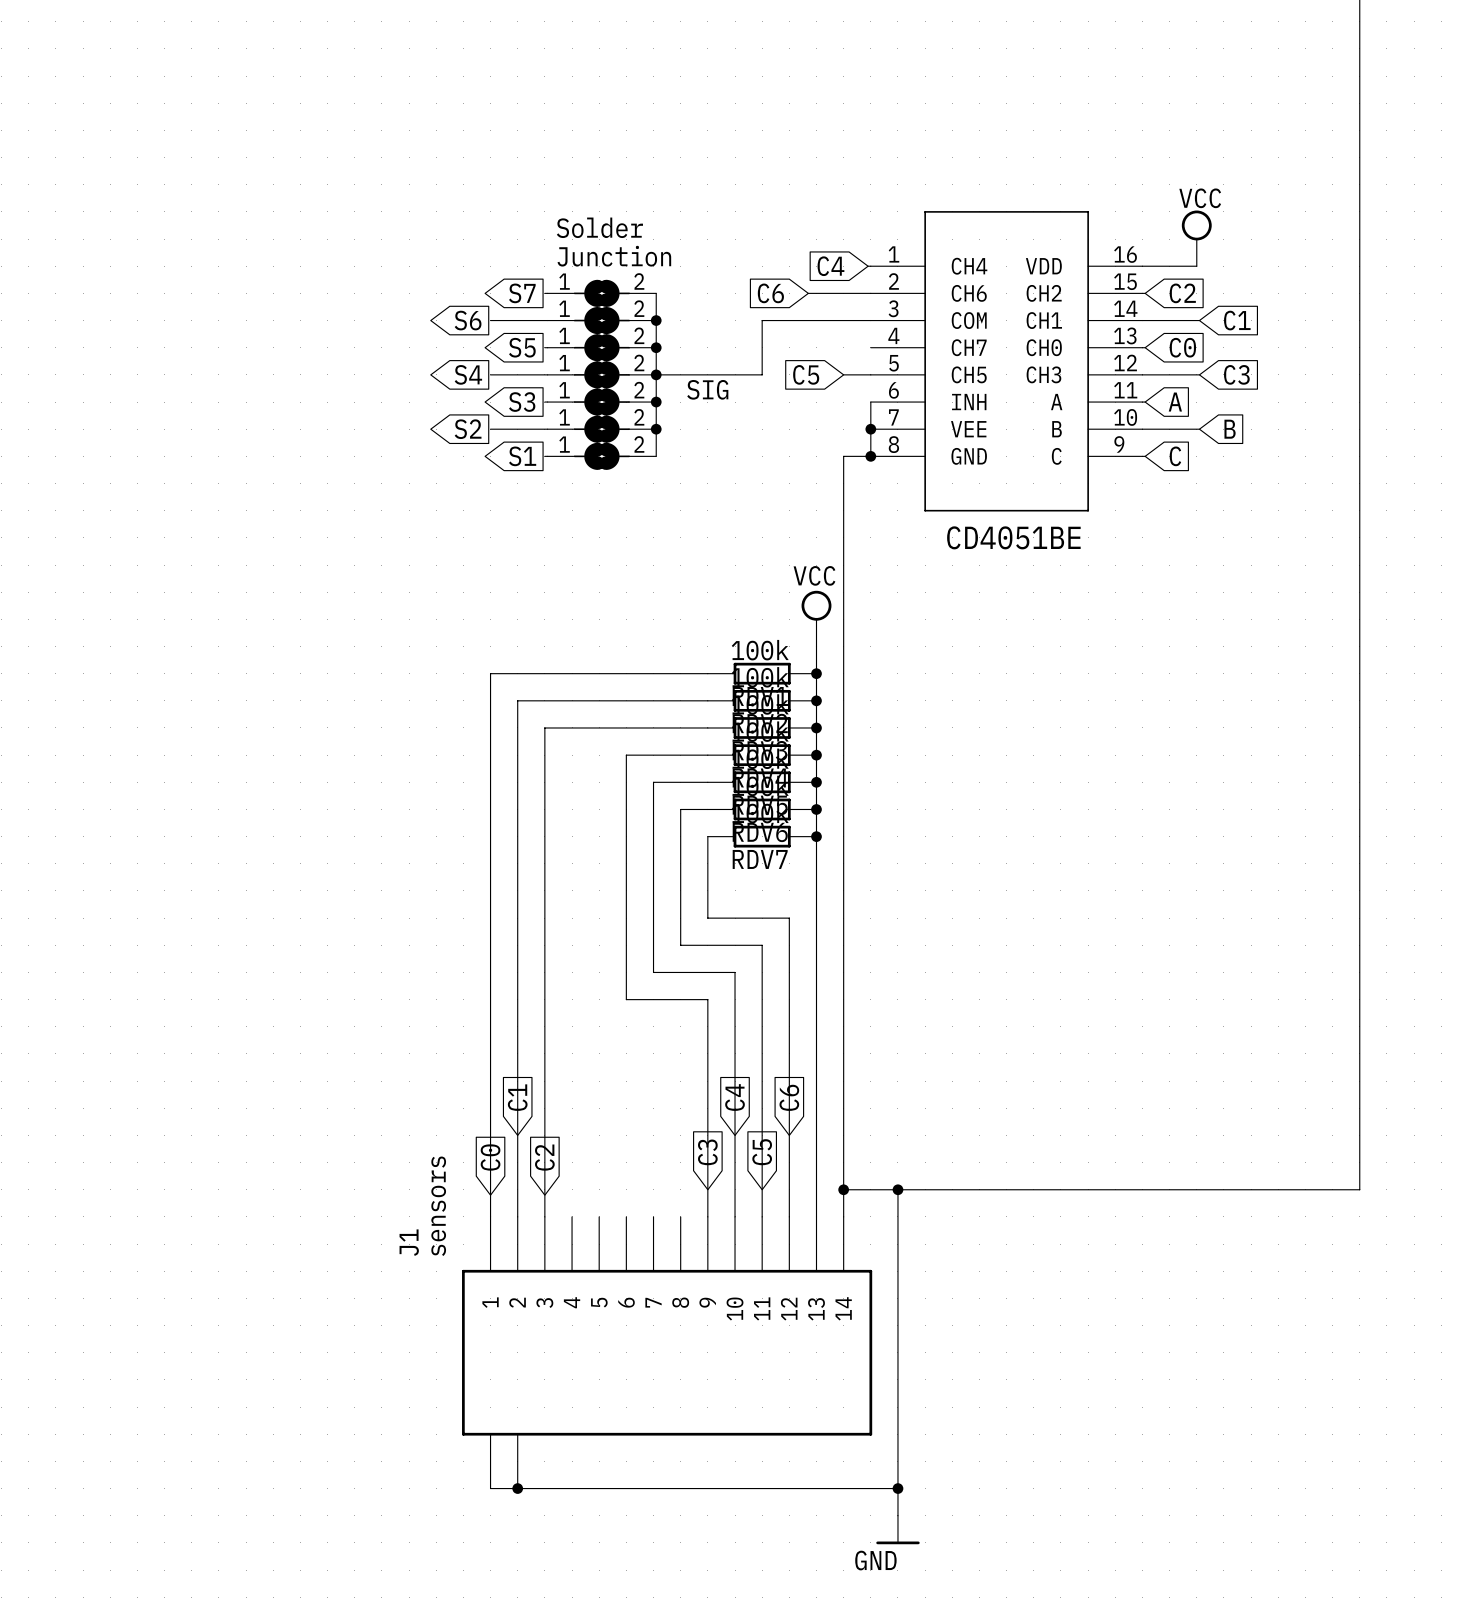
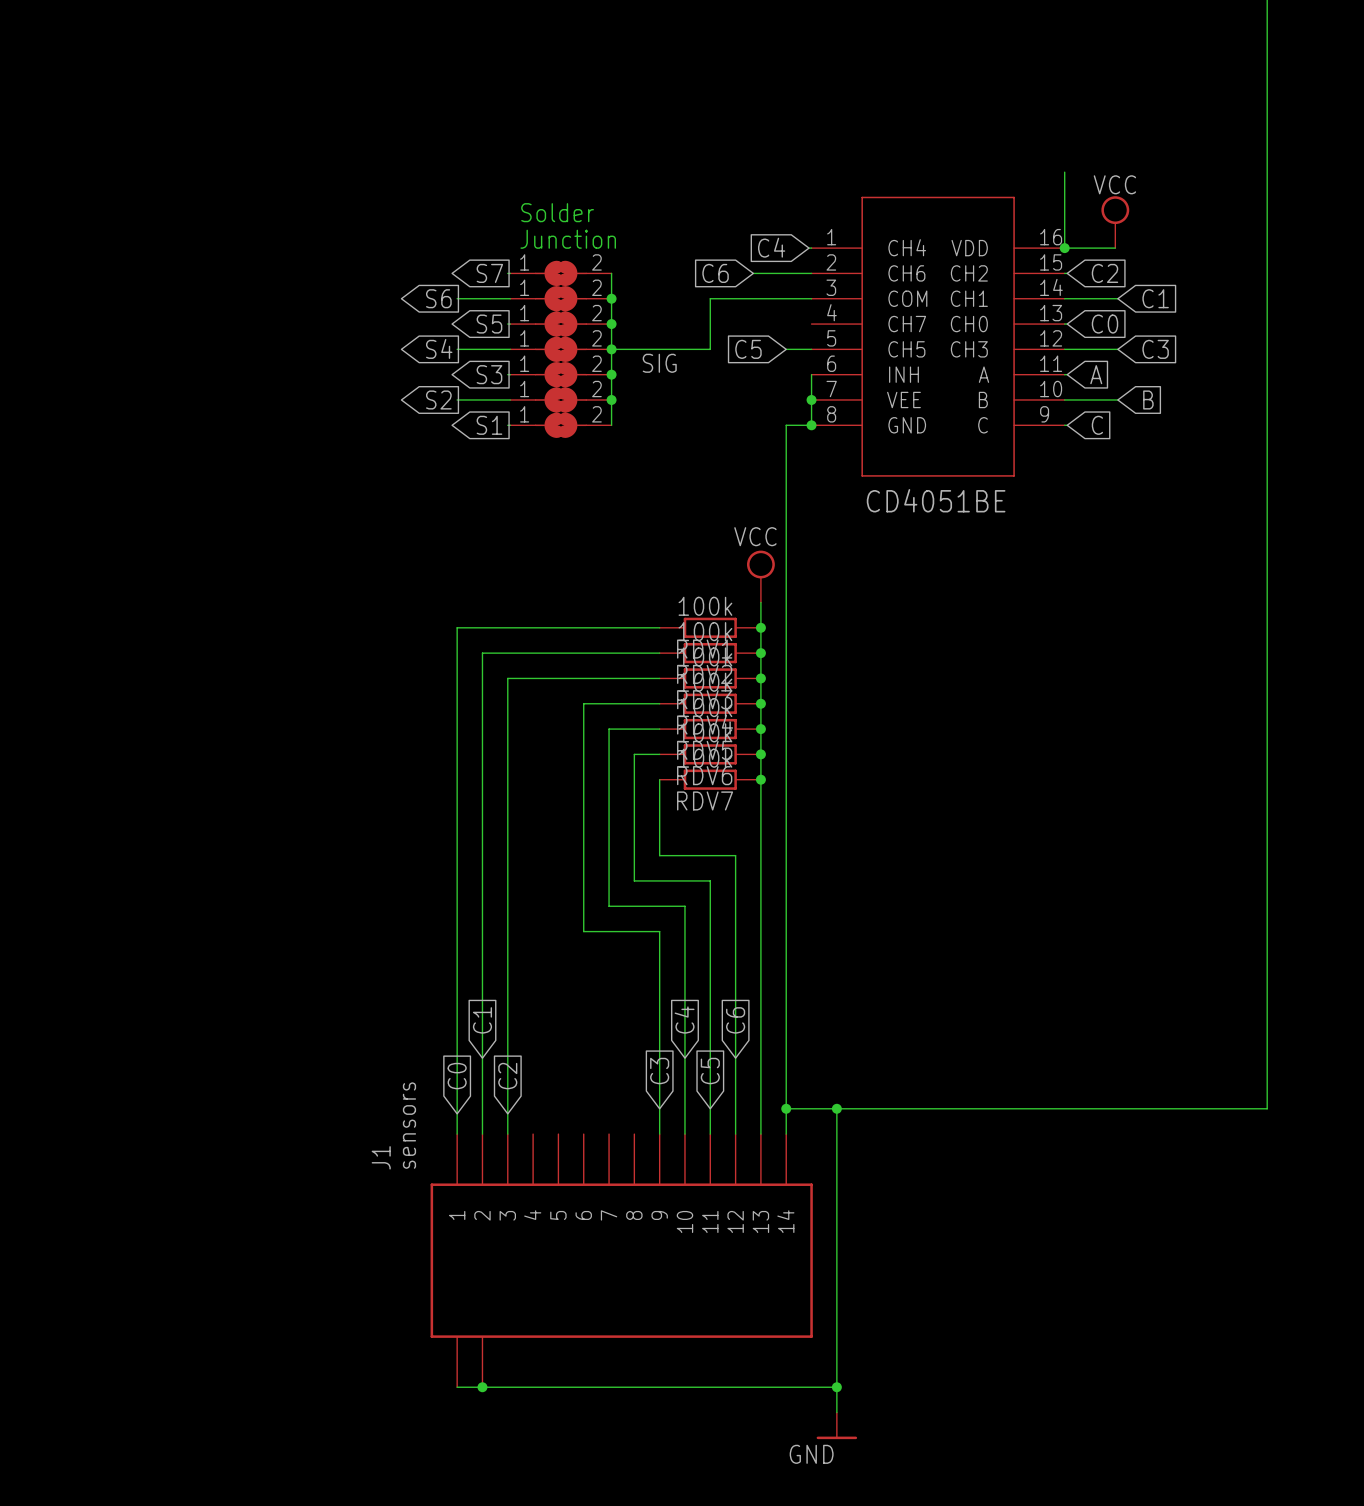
wire: none -> (1064, 172) (1064, 248)
junction: none -> (1064, 248)

